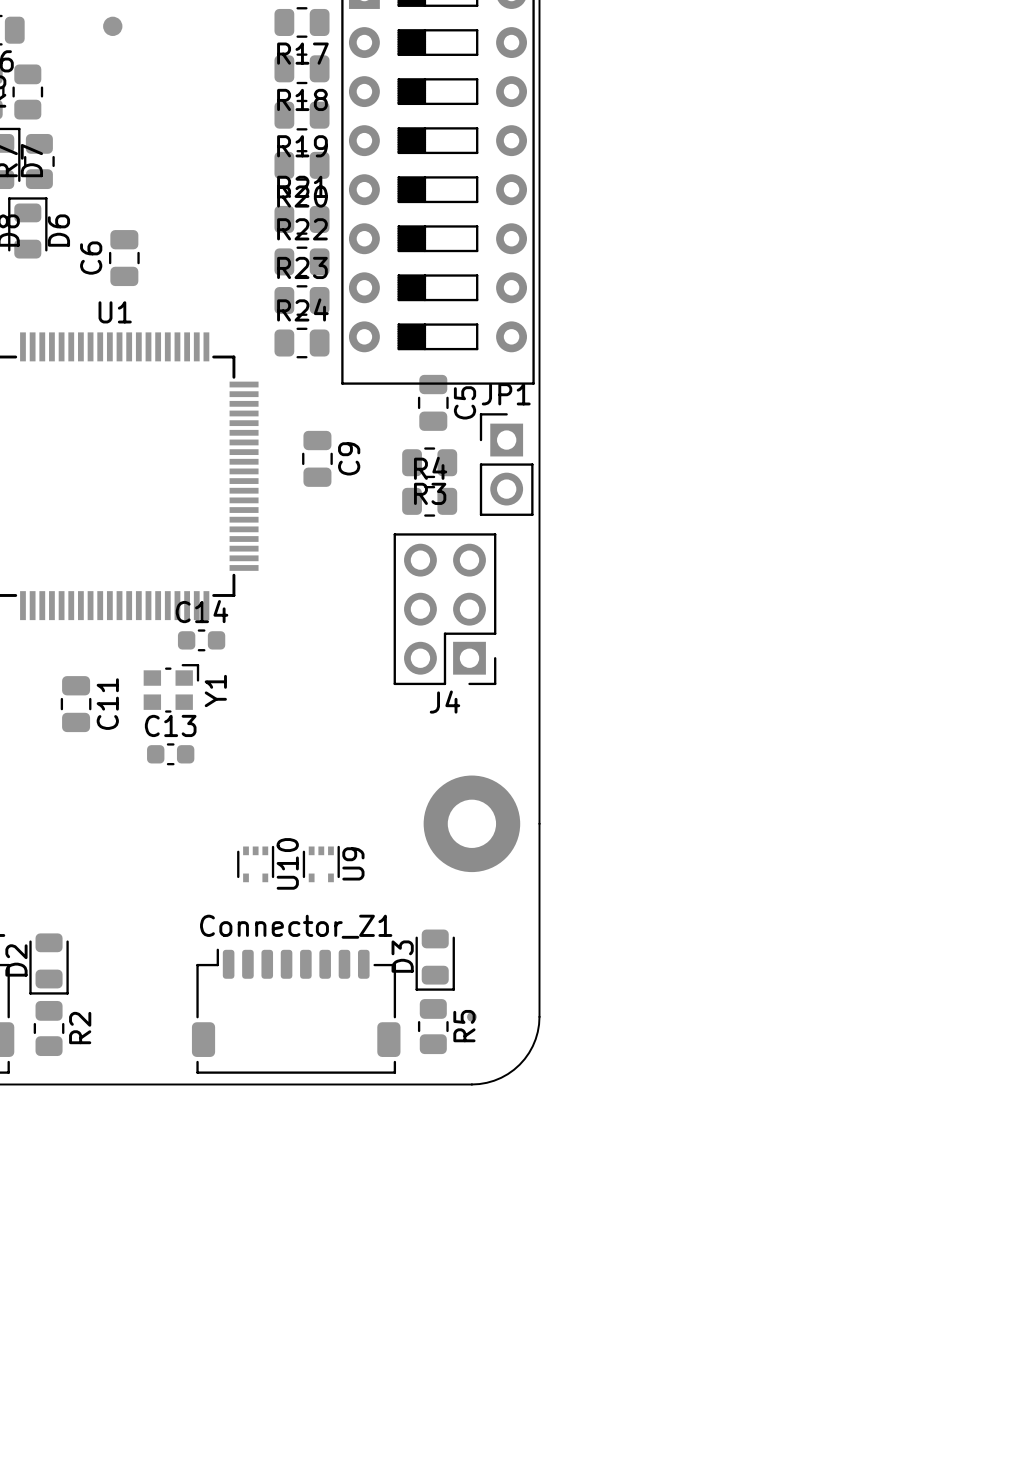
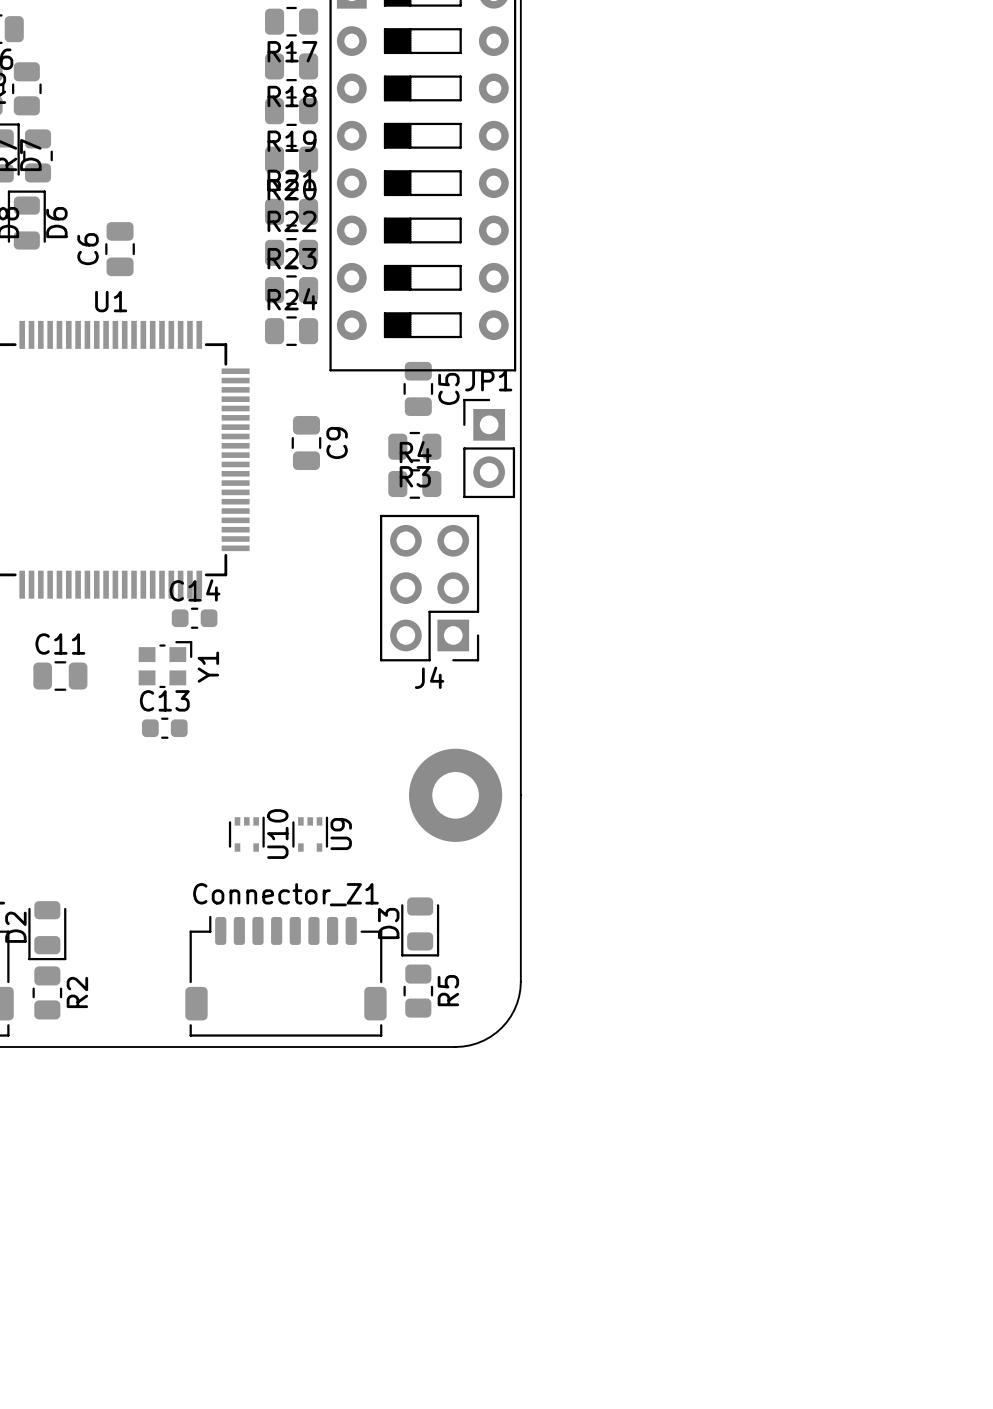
part: (112, 26) -> none
C11 rotation: 0° (76, 704) -> 90° clockwise (60, 676)
C11 name position: C11 (107, 704) -> C11 (60, 644)
part: (471, 1016) -> none

